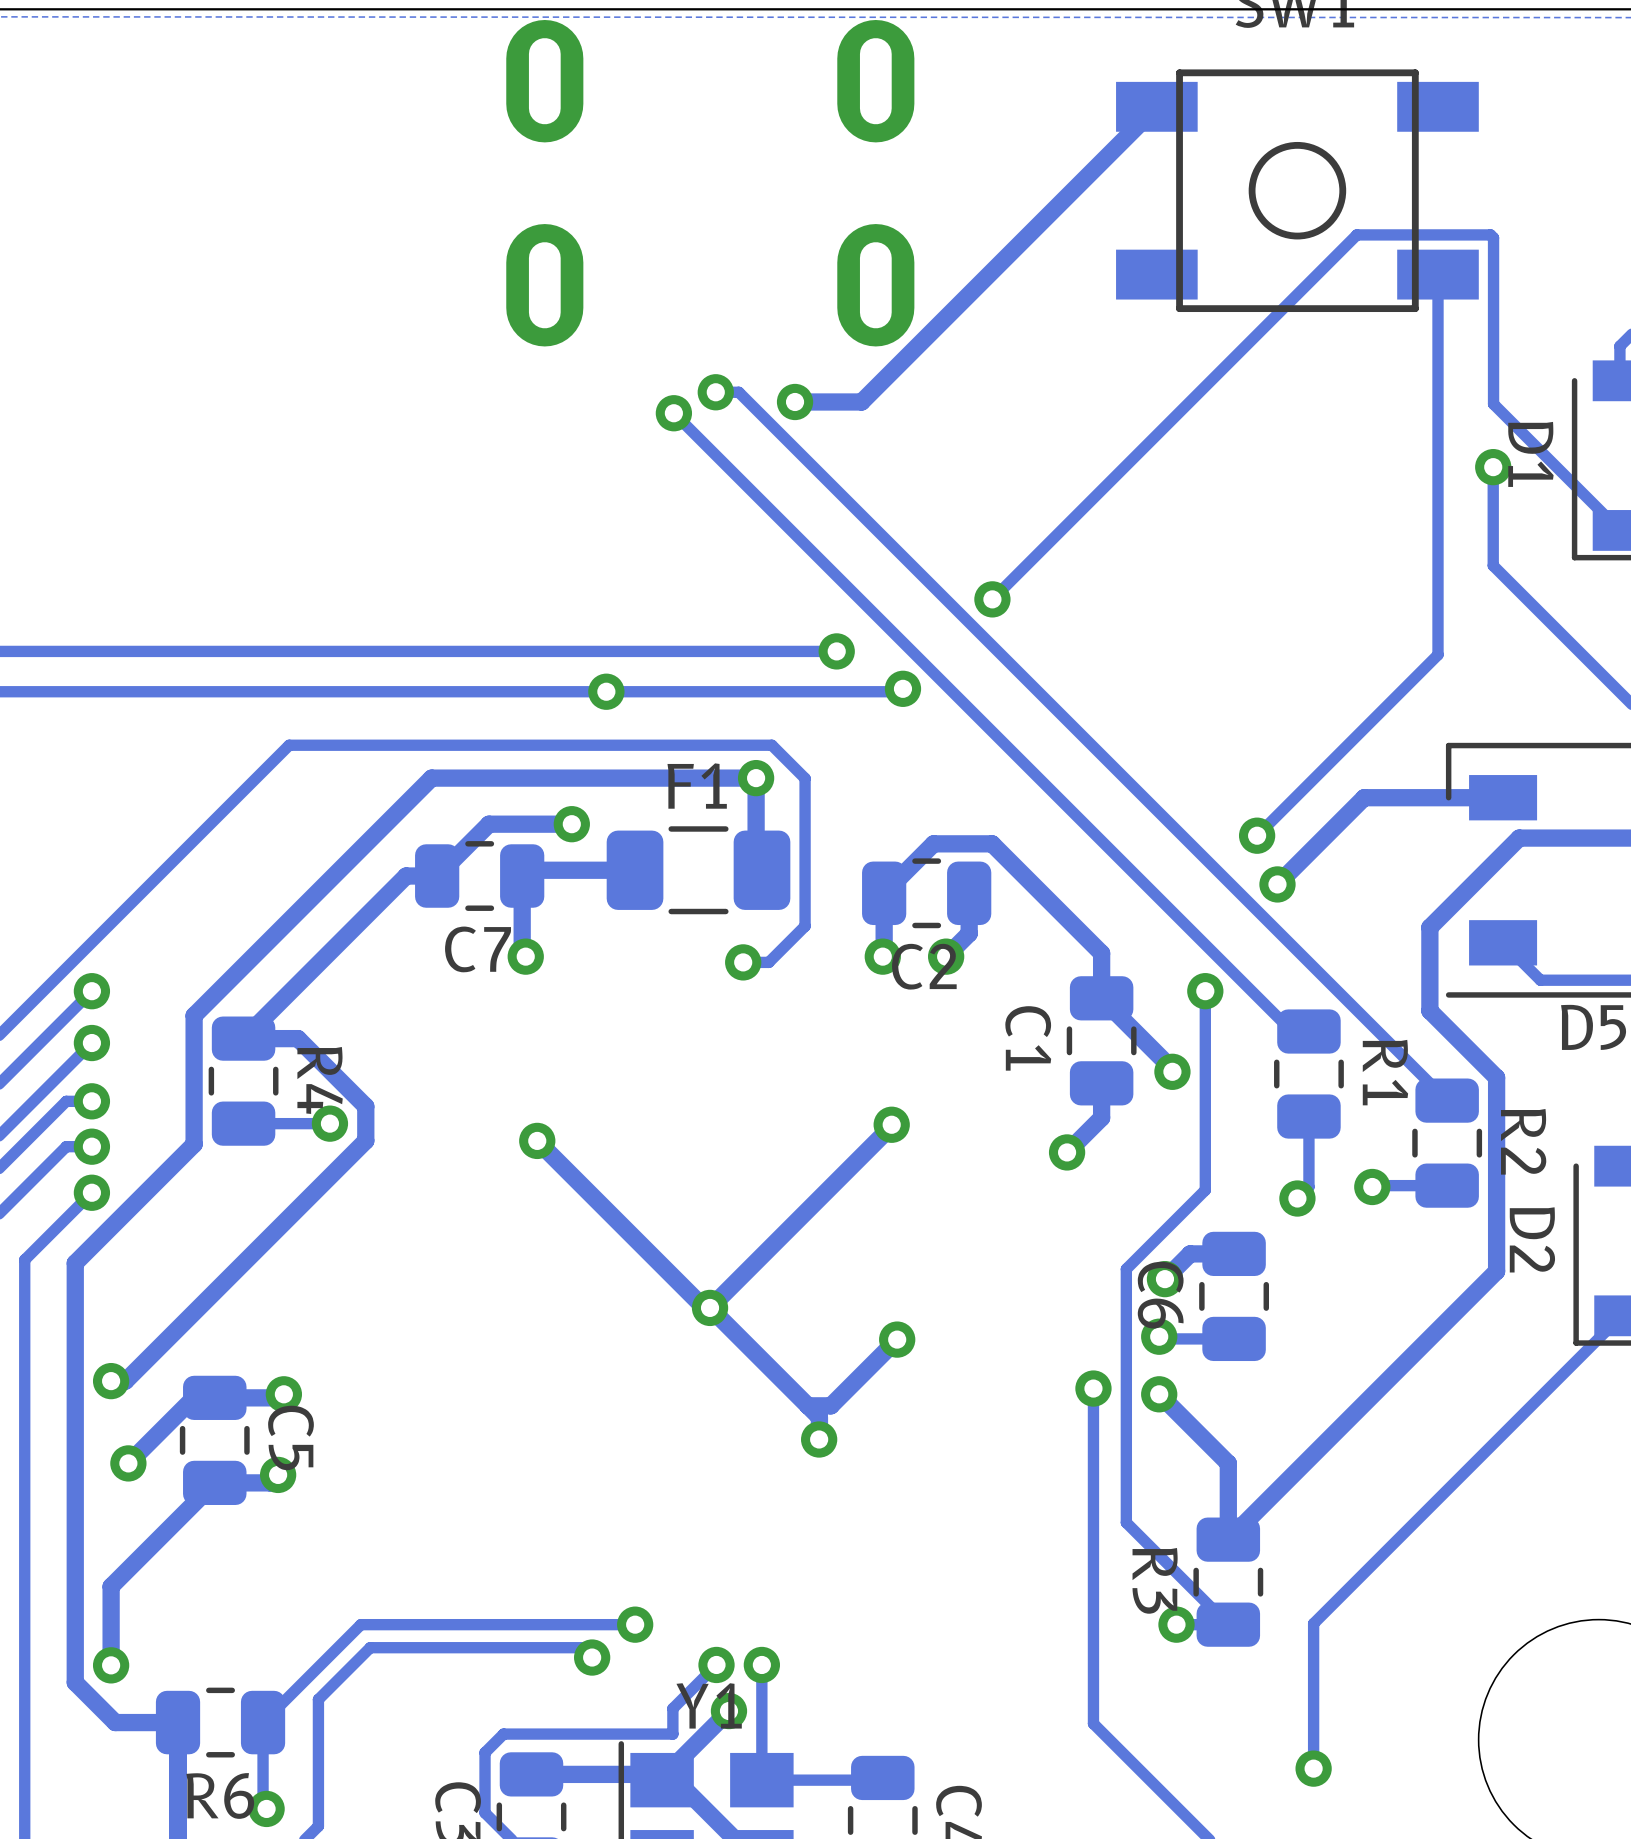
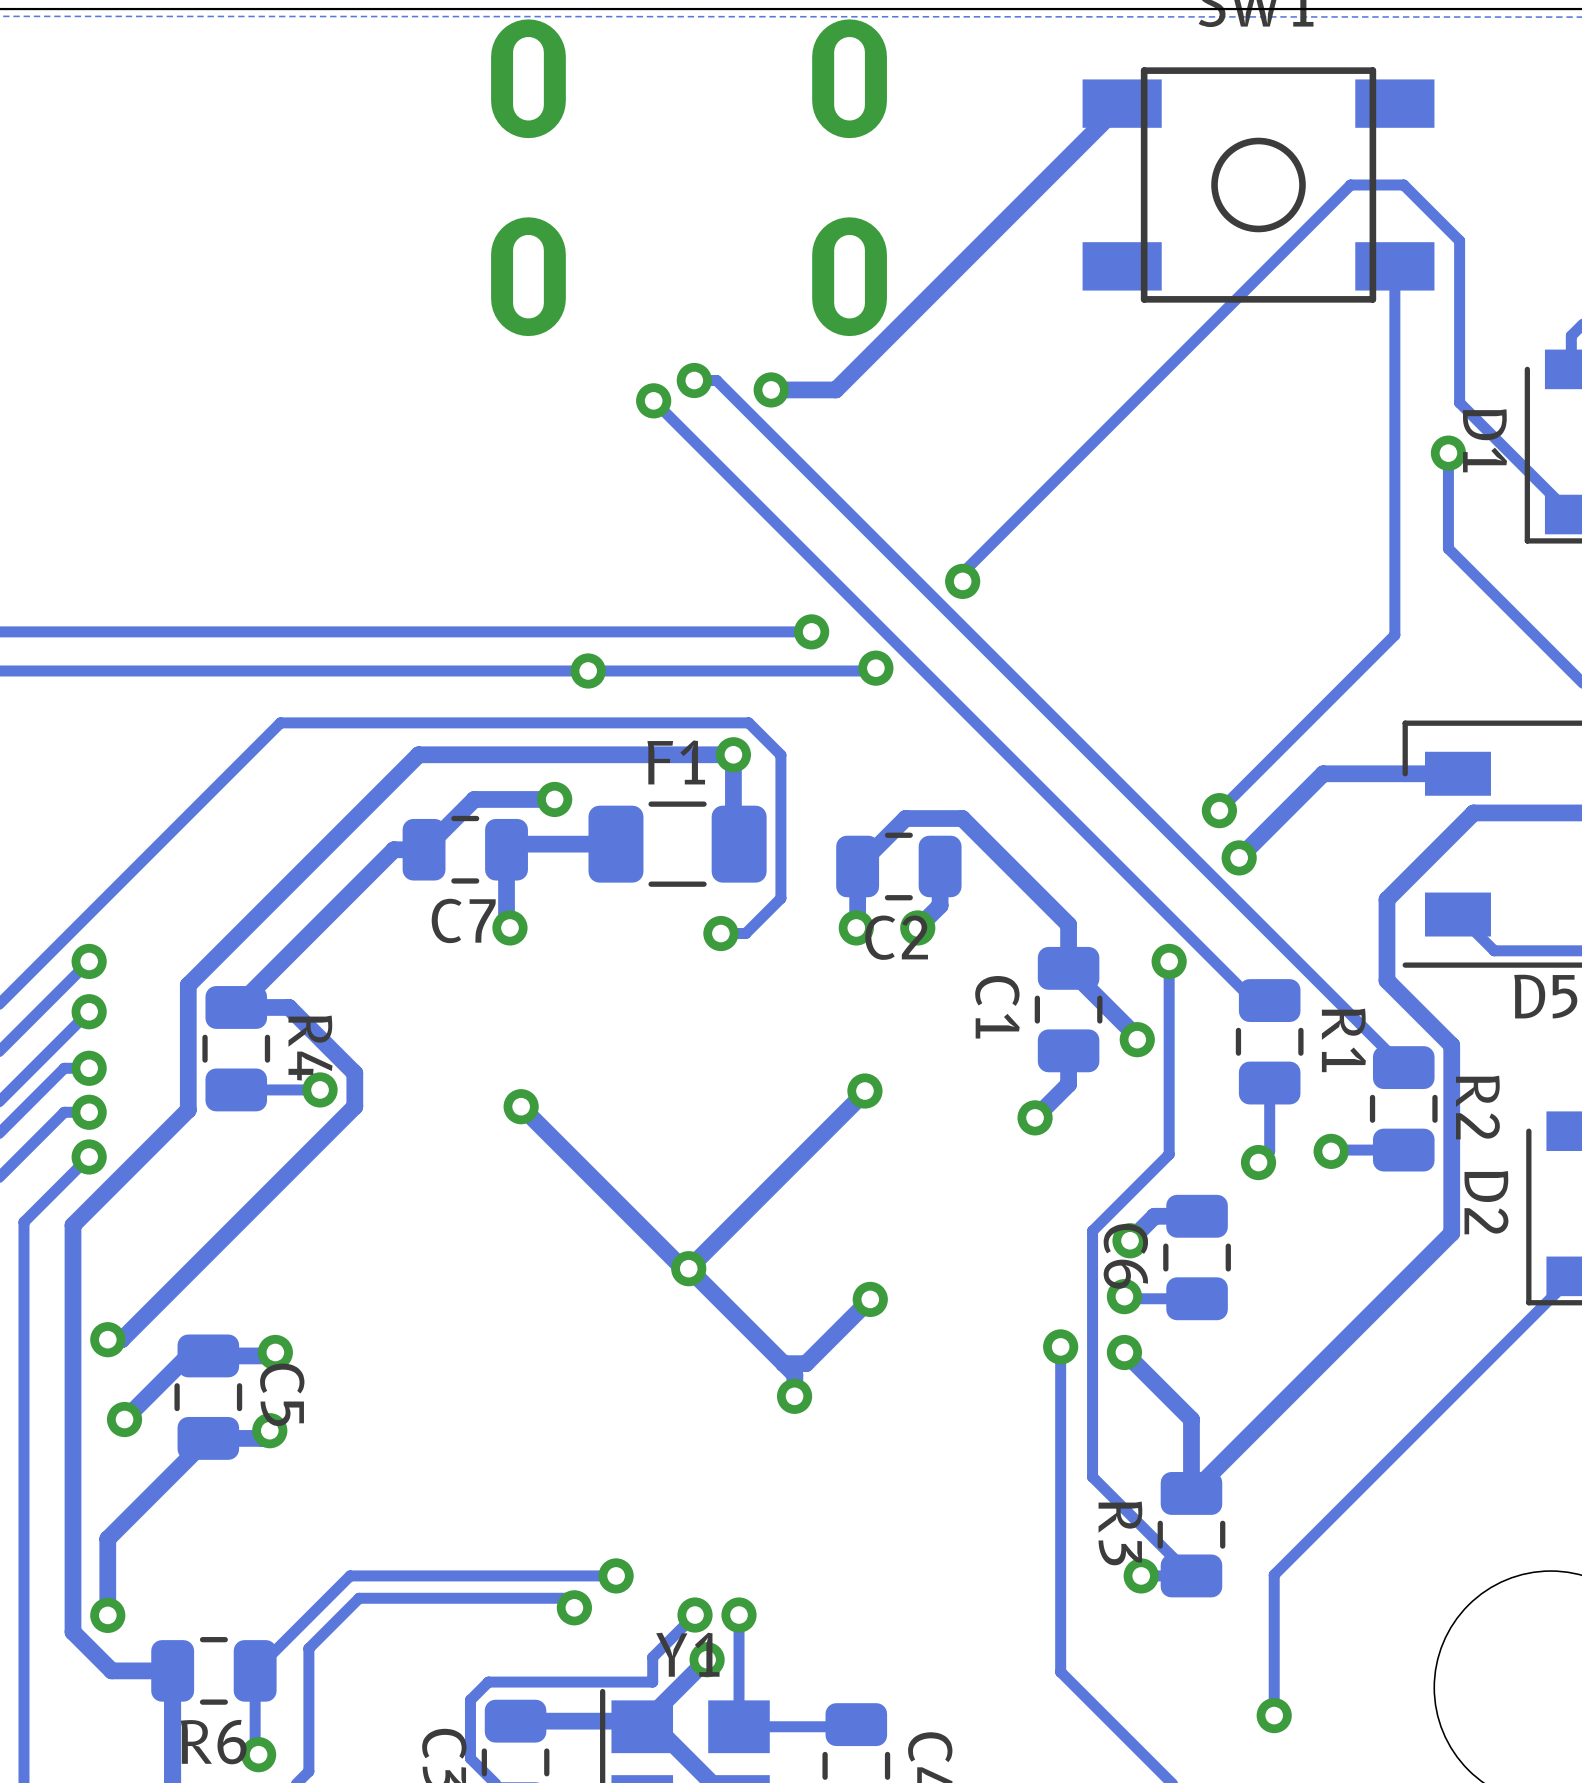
track: (1504, 415) (1493, 404) (1493, 237) (1490, 234) (1356, 234) (992, 599) -> (1459, 402) (1459, 240) (1403, 184) (1350, 184) (962, 573) (962, 581)

